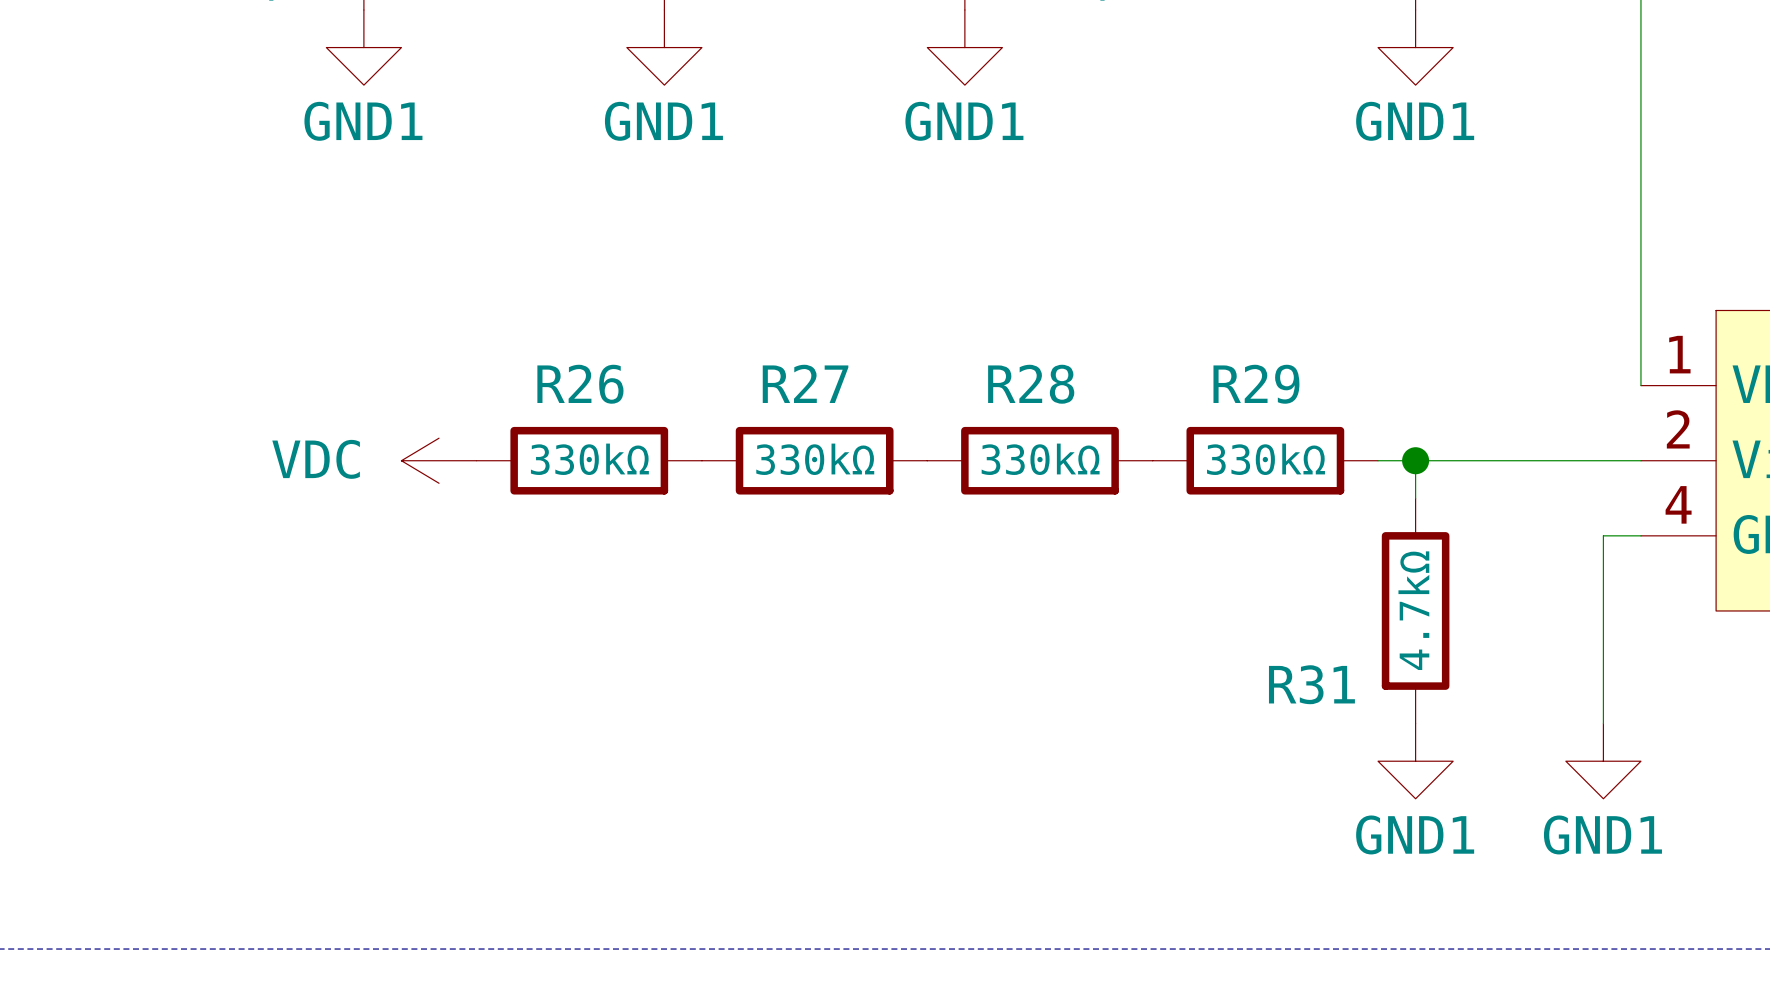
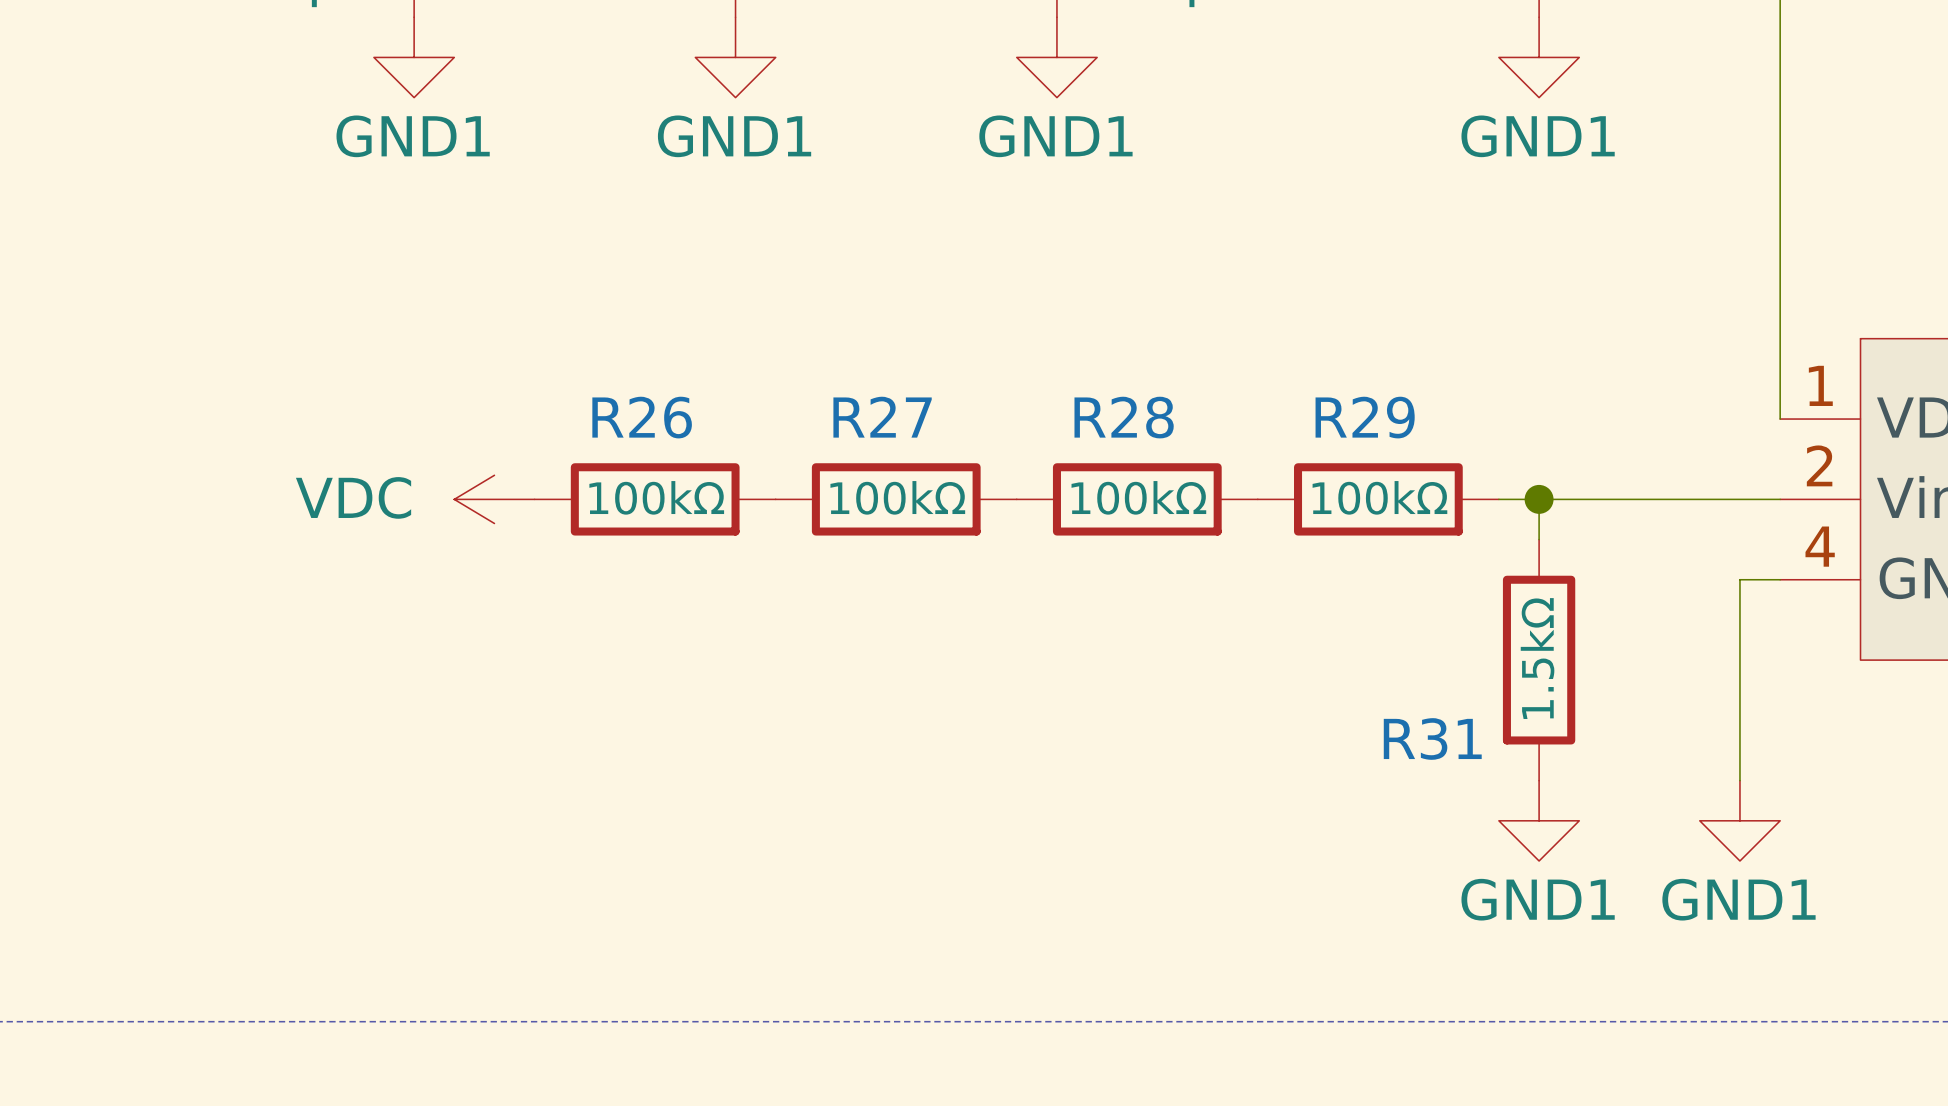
R26 value: 330kΩ (589, 459) -> 100kΩ (656, 497)
R27 value: 330kΩ (815, 459) -> 100kΩ (897, 497)
R28 value: 330kΩ (1040, 459) -> 100kΩ (1138, 497)
R29 value: 330kΩ (1265, 459) -> 100kΩ (1379, 497)
R31 value: 4.7kΩ (1413, 610) -> 1.5kΩ (1537, 658)

